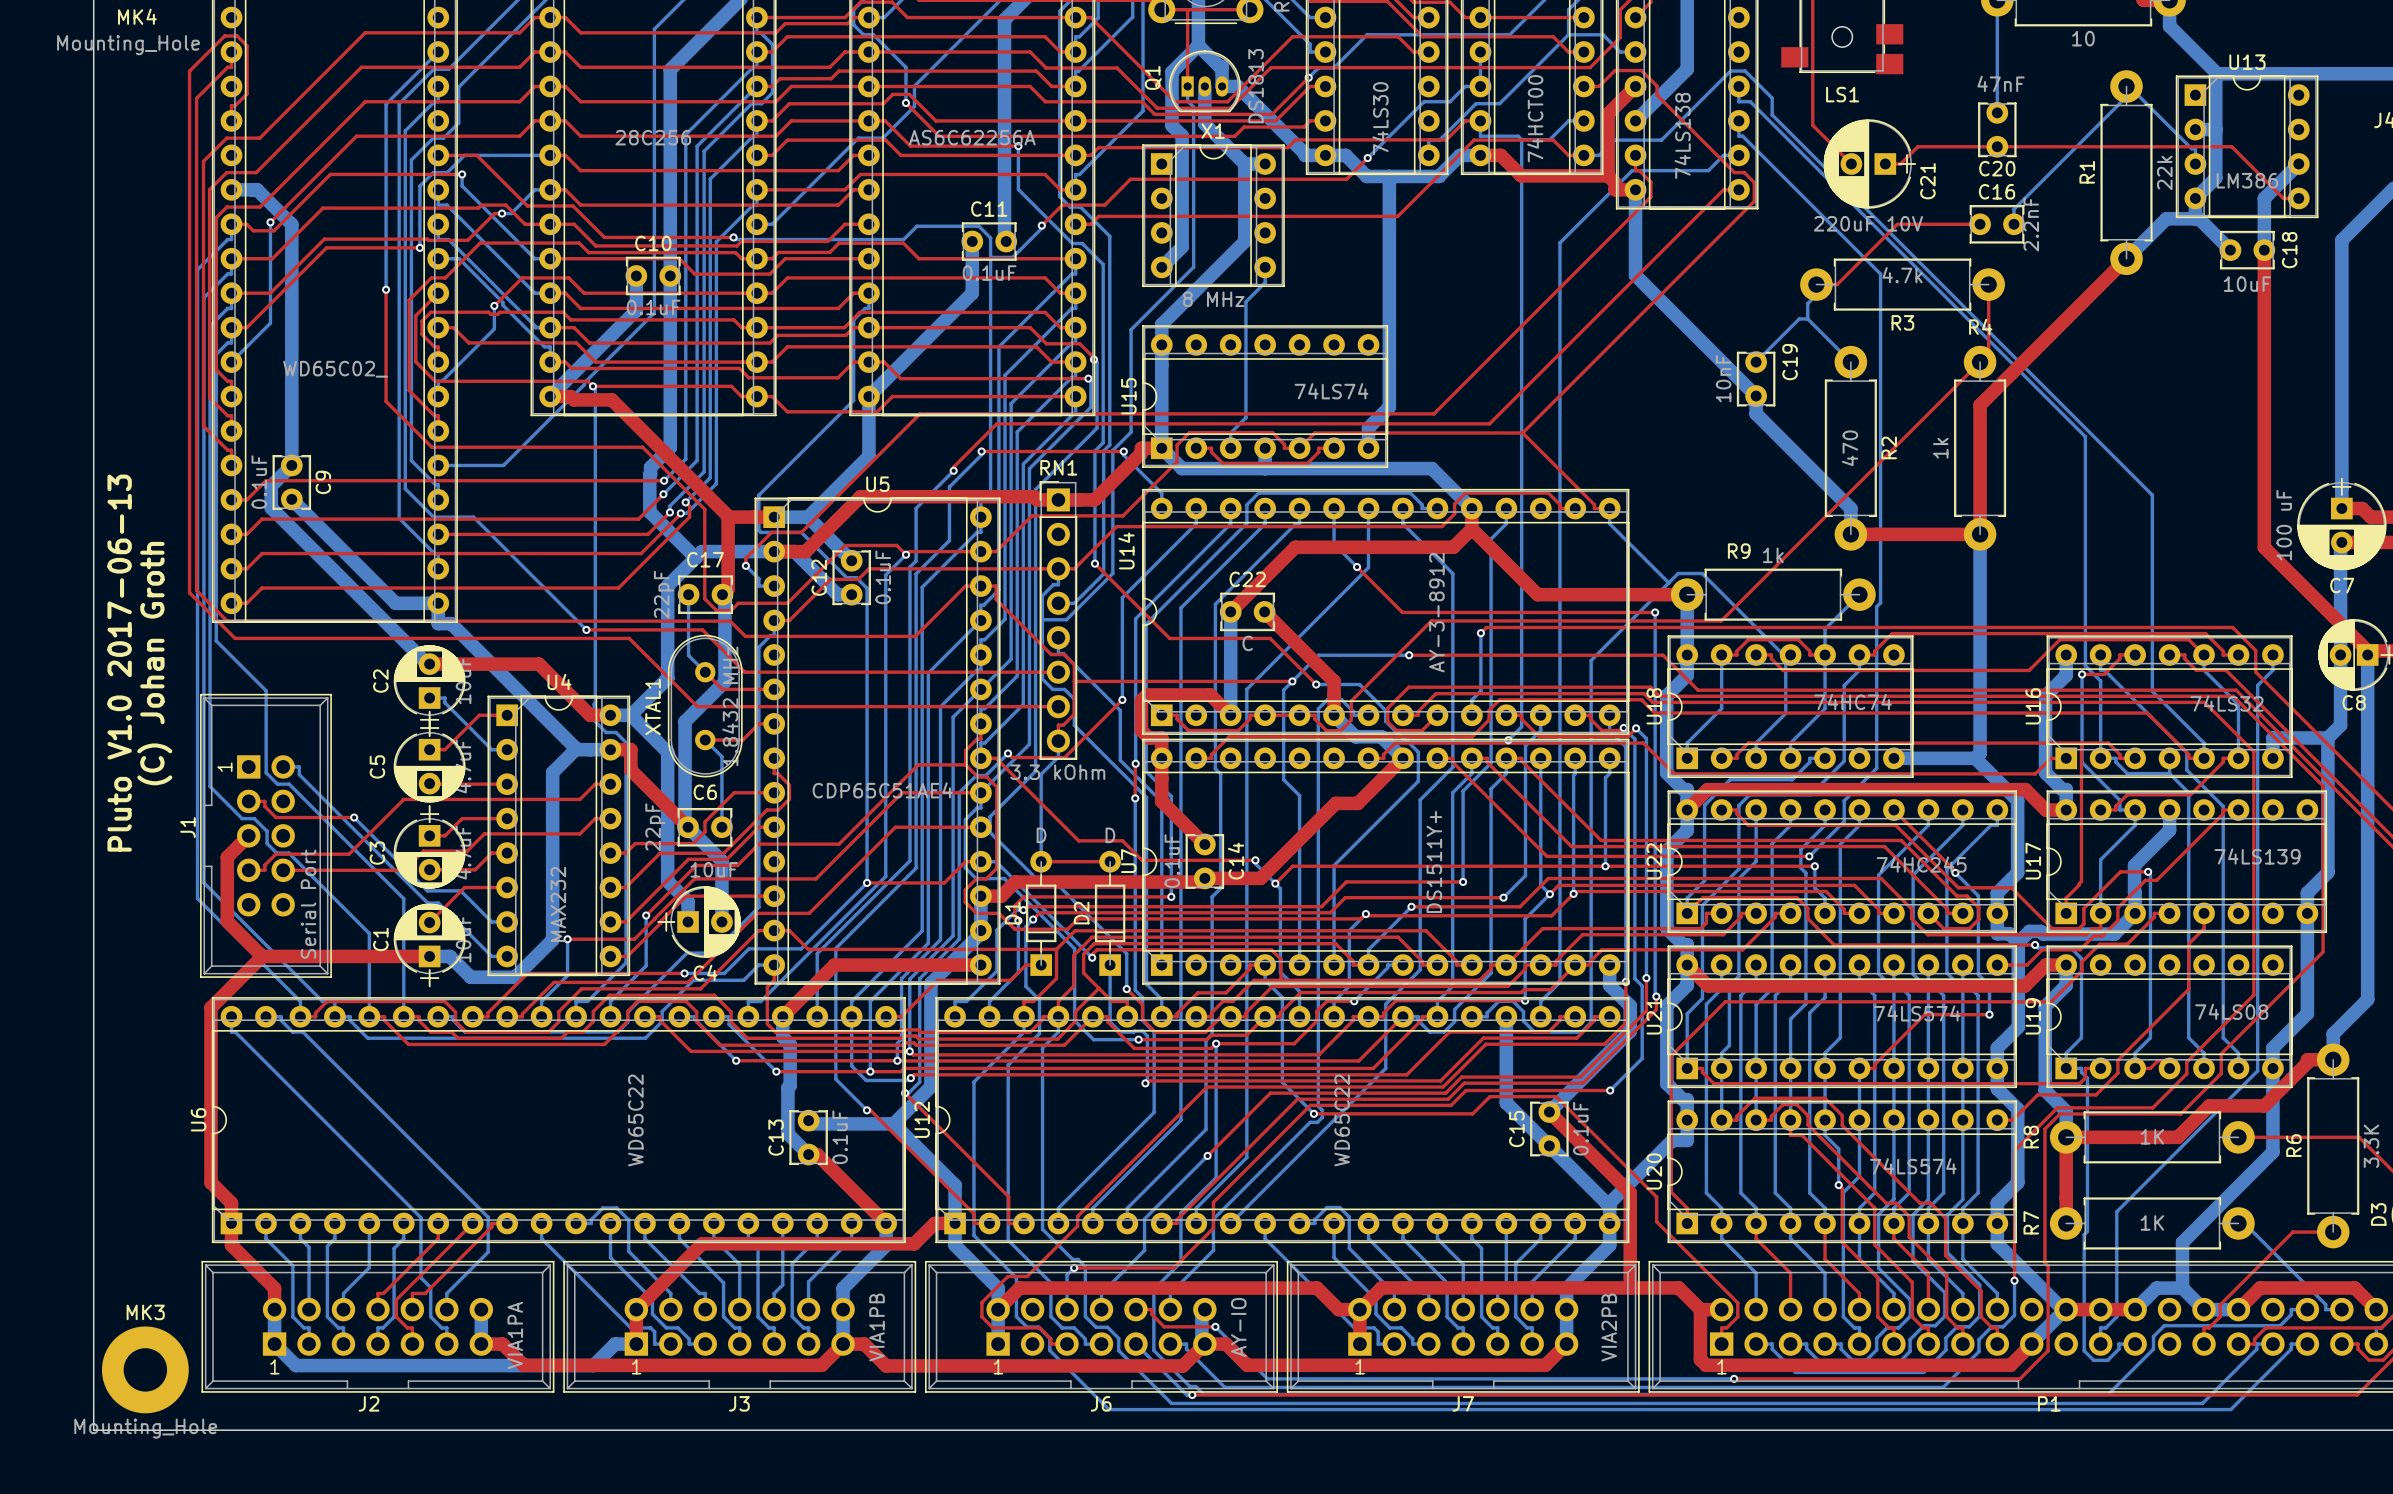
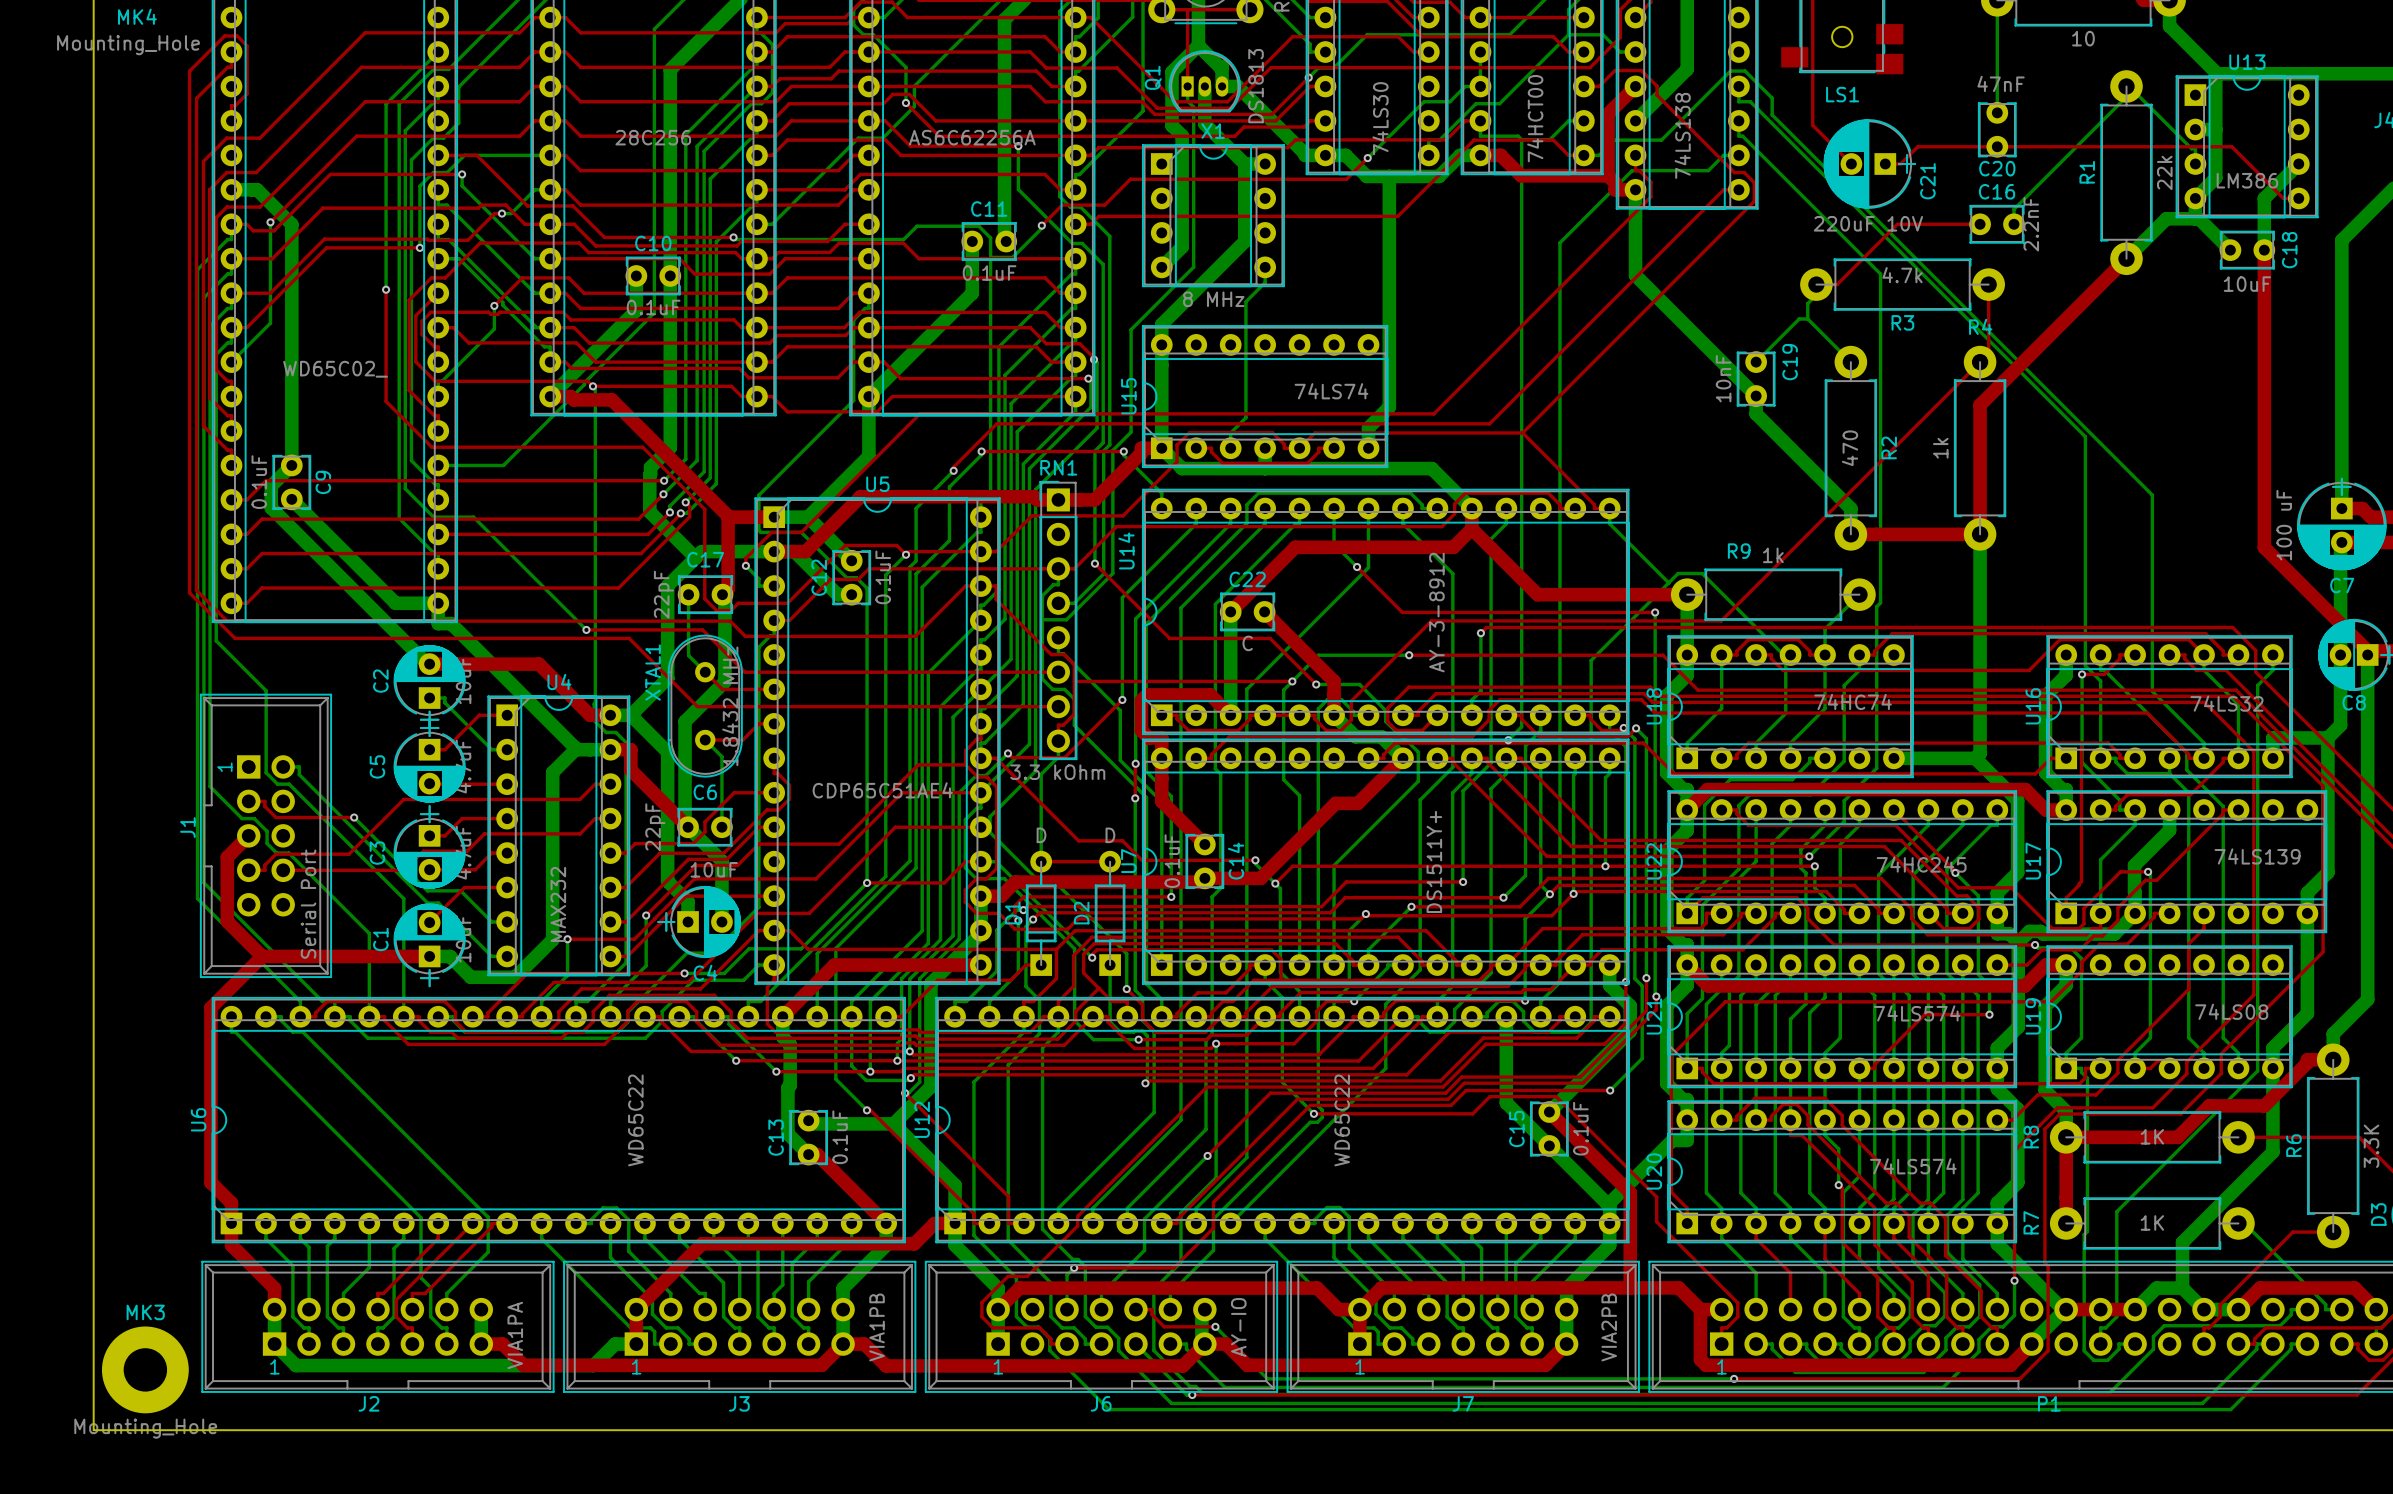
text: Pluto V1.0 2017-06-13 (119, 663) -> none
text: (C) Johan Groth (154, 663) -> none
XTAL1 name position: XTAL1 (653, 706) -> XTAL1 (653, 672)

